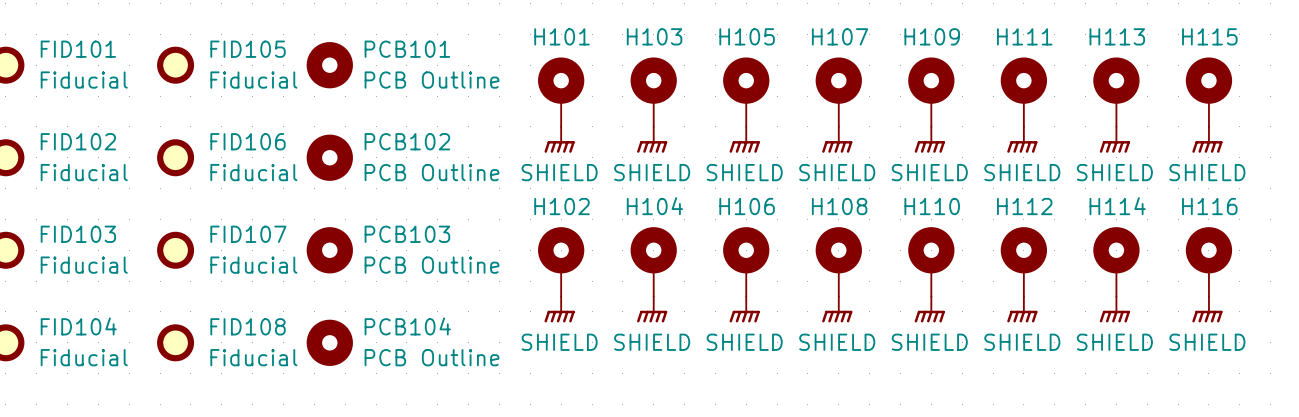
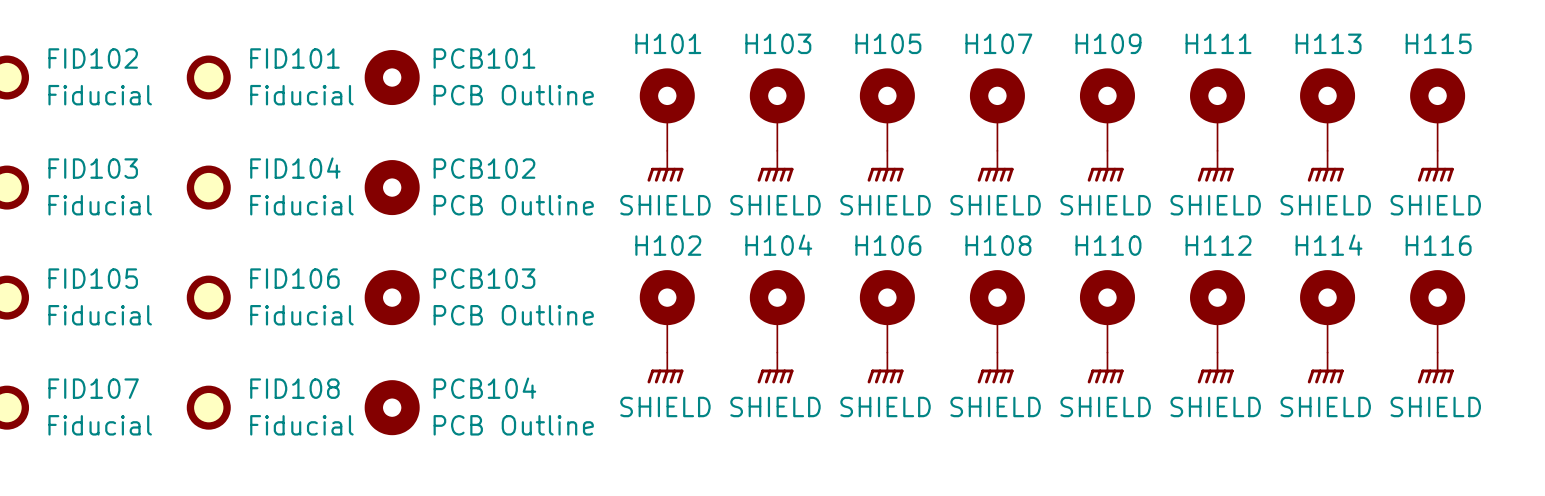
FID101 name: FID101 (78, 49) -> FID102 (93, 58)
FID105 name: FID105 (248, 49) -> FID101 (294, 58)
FID102 name: FID102 (78, 141) -> FID103 (93, 168)
FID106 name: FID106 (248, 141) -> FID104 (295, 168)
FID103 name: FID103 (78, 234) -> FID105 (93, 278)
FID107 name: FID107 (248, 234) -> FID106 (294, 278)
FID104 name: FID104 (78, 326) -> FID107 (93, 388)

